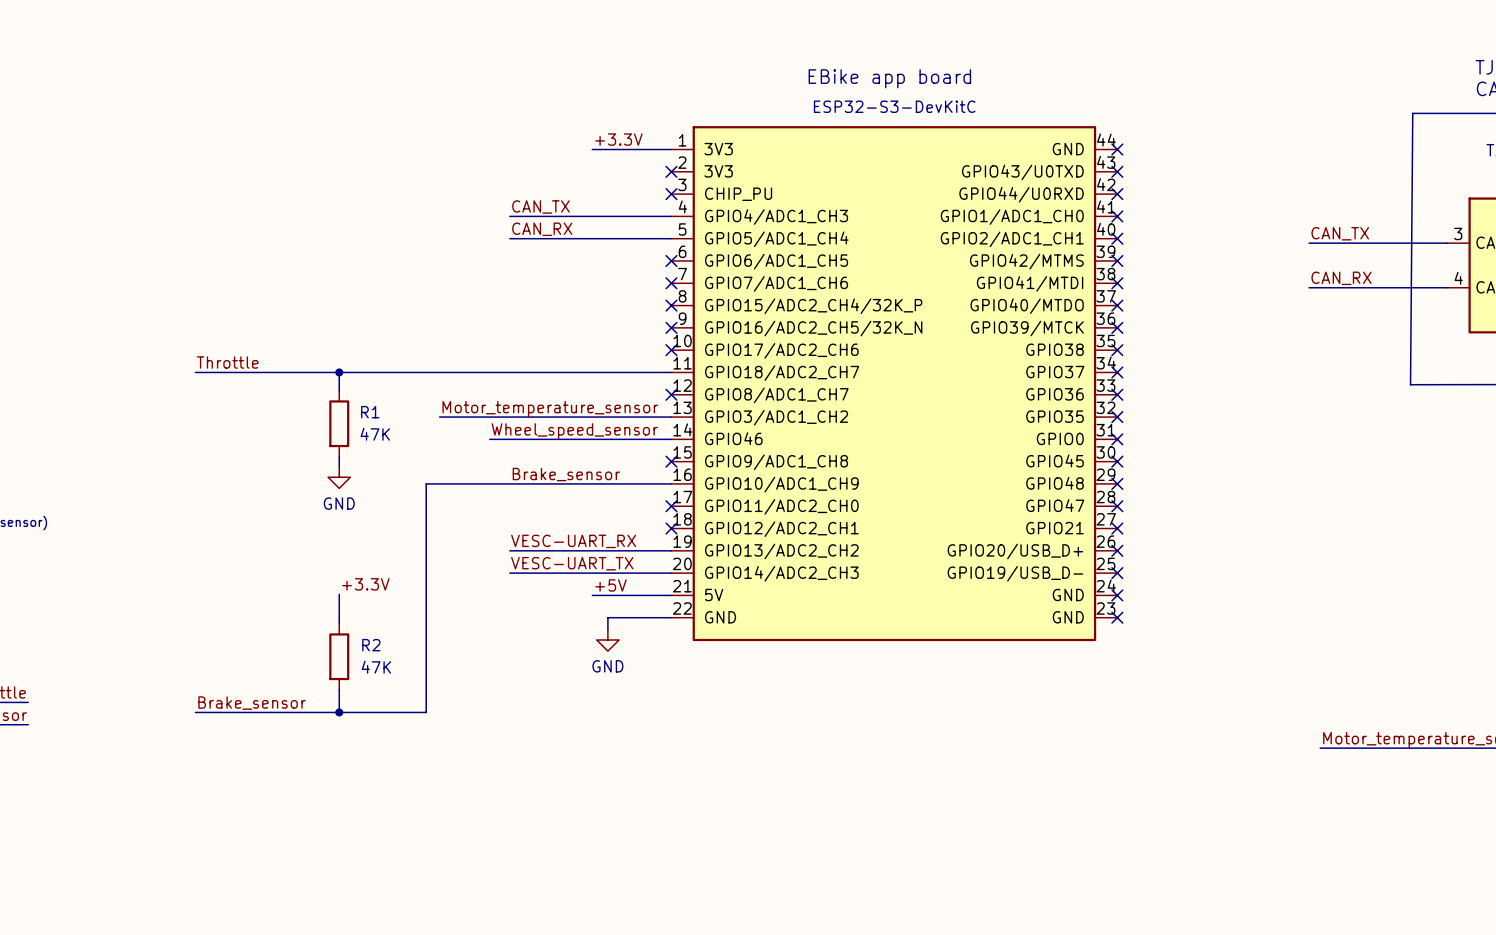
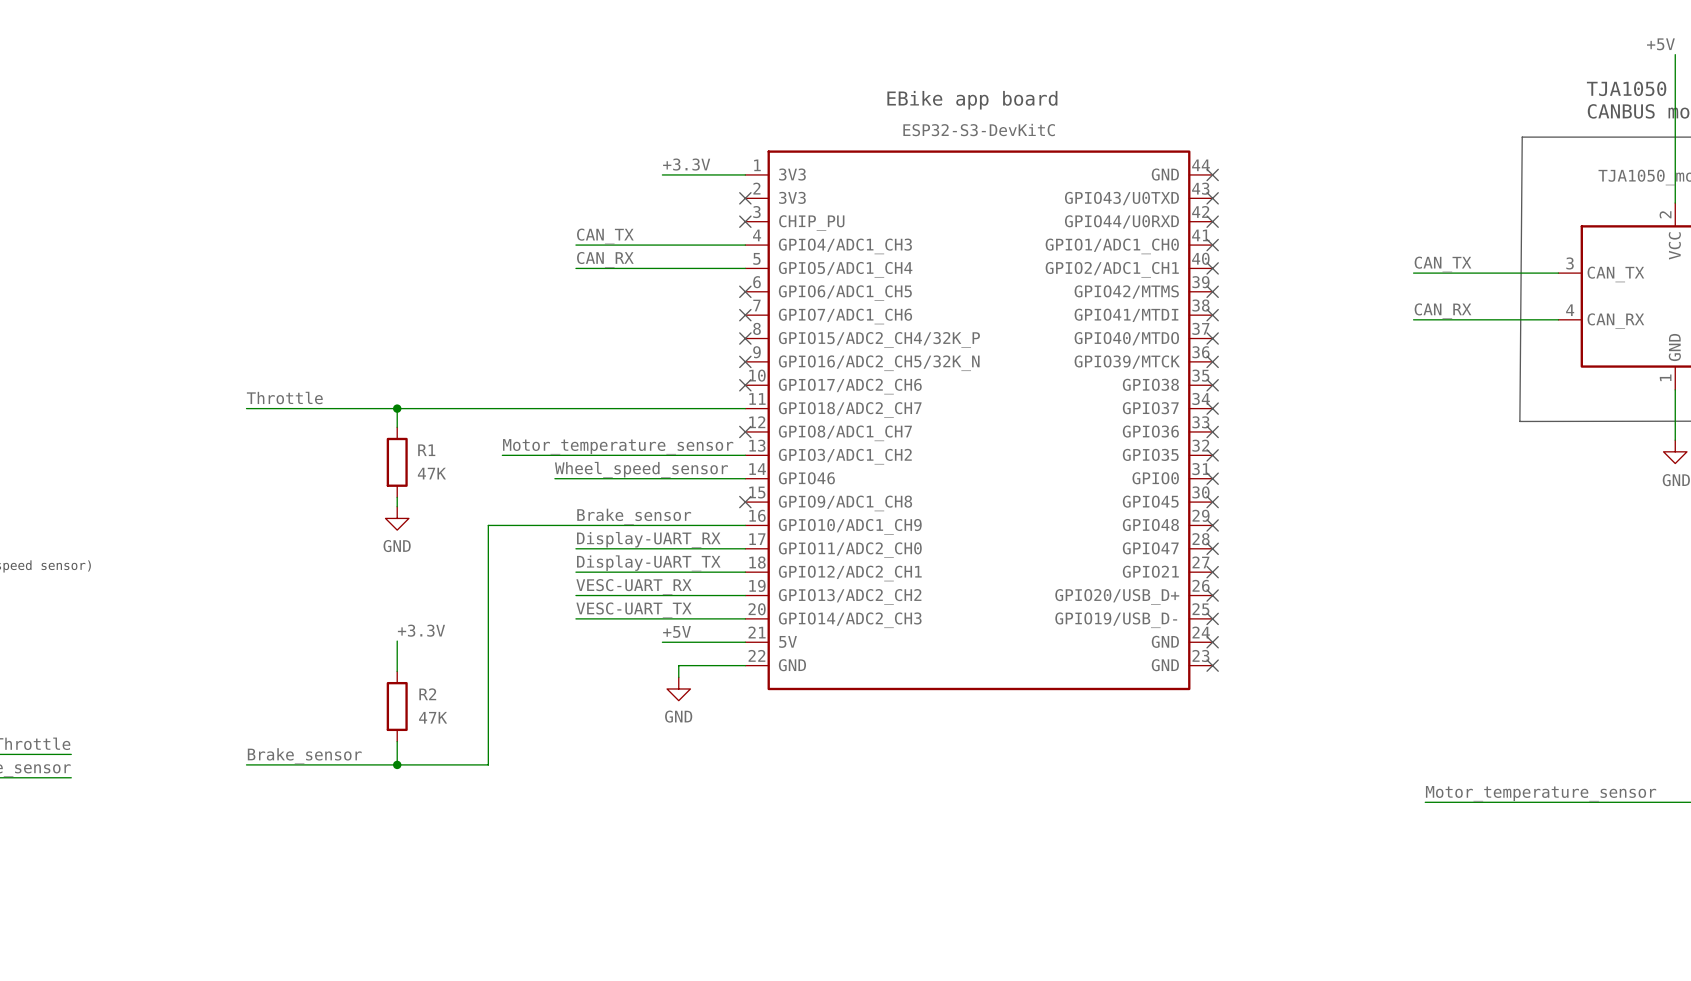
label: none -> Display-UART_RX (648, 539)
wire: none -> (575, 548) (745, 548)
no-connect mark: (671, 506) -> none
label: none -> Display-UART_TX (648, 563)
wire: none -> (575, 572) (745, 572)
no-connect mark: (671, 528) -> none

